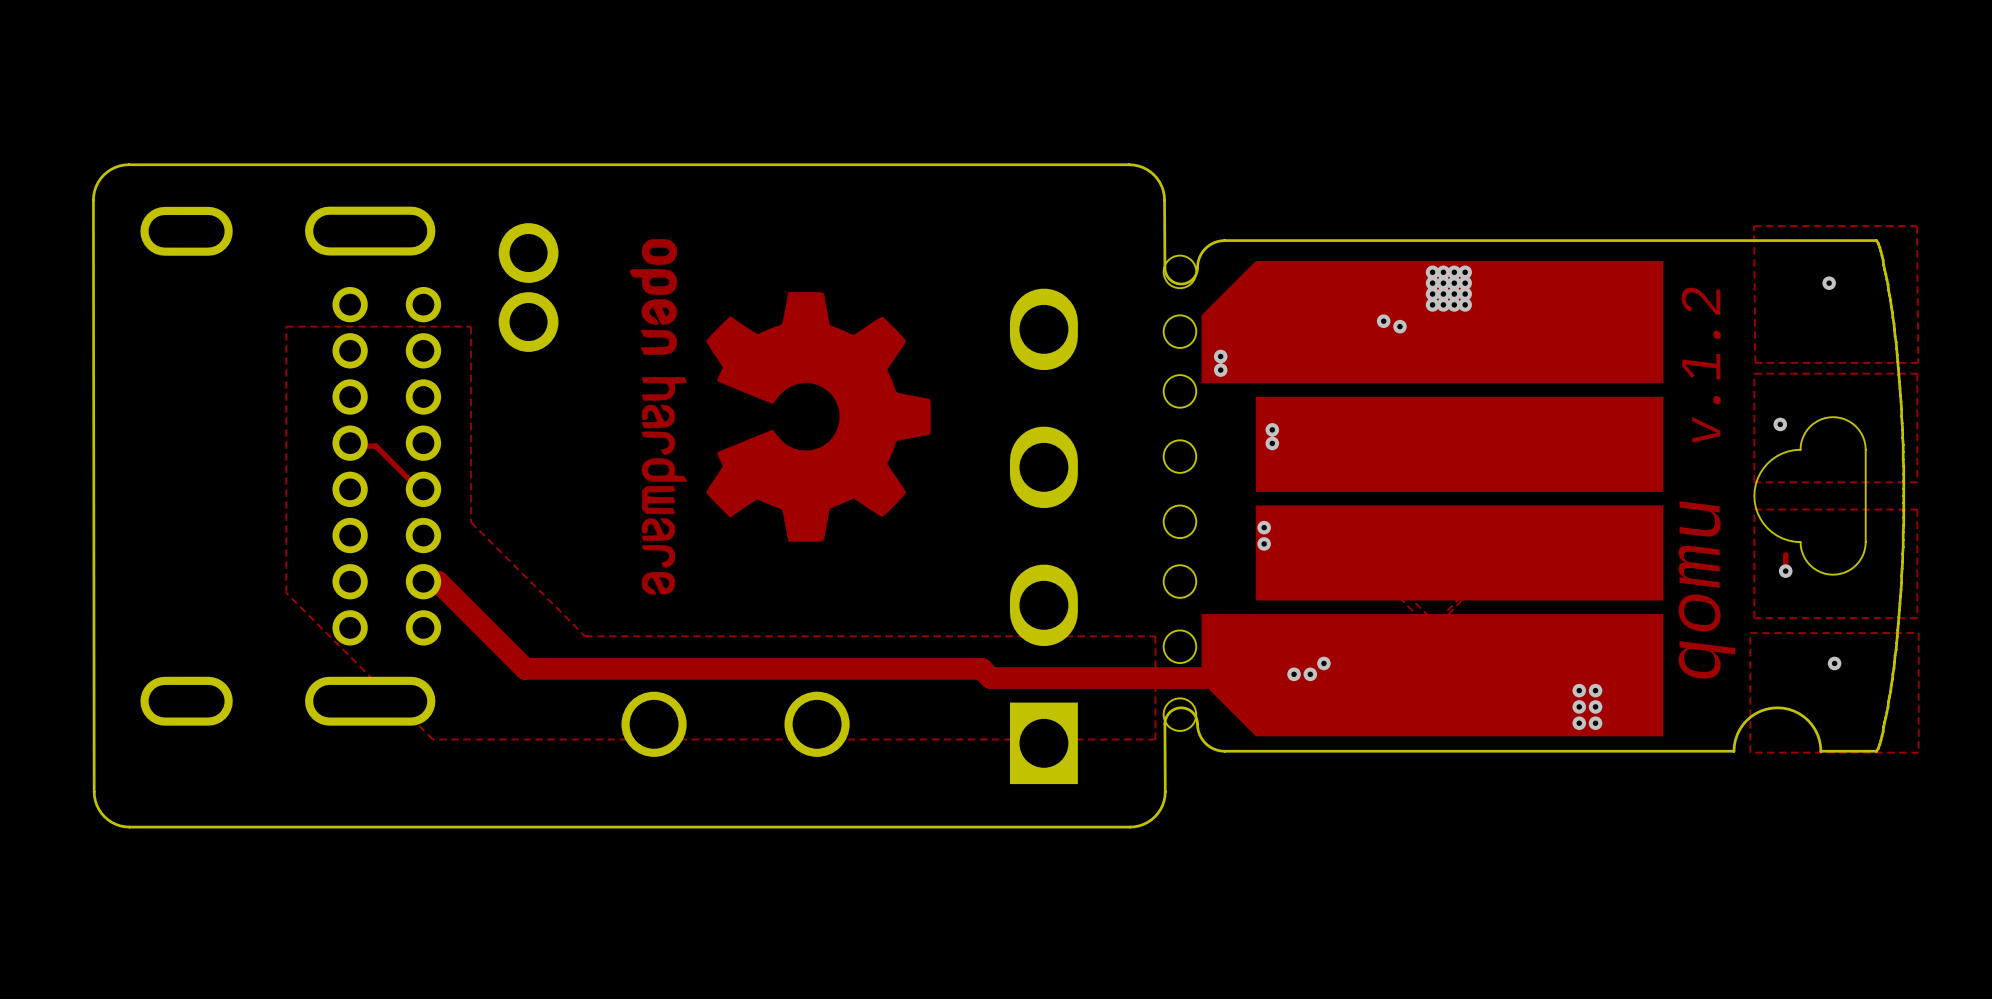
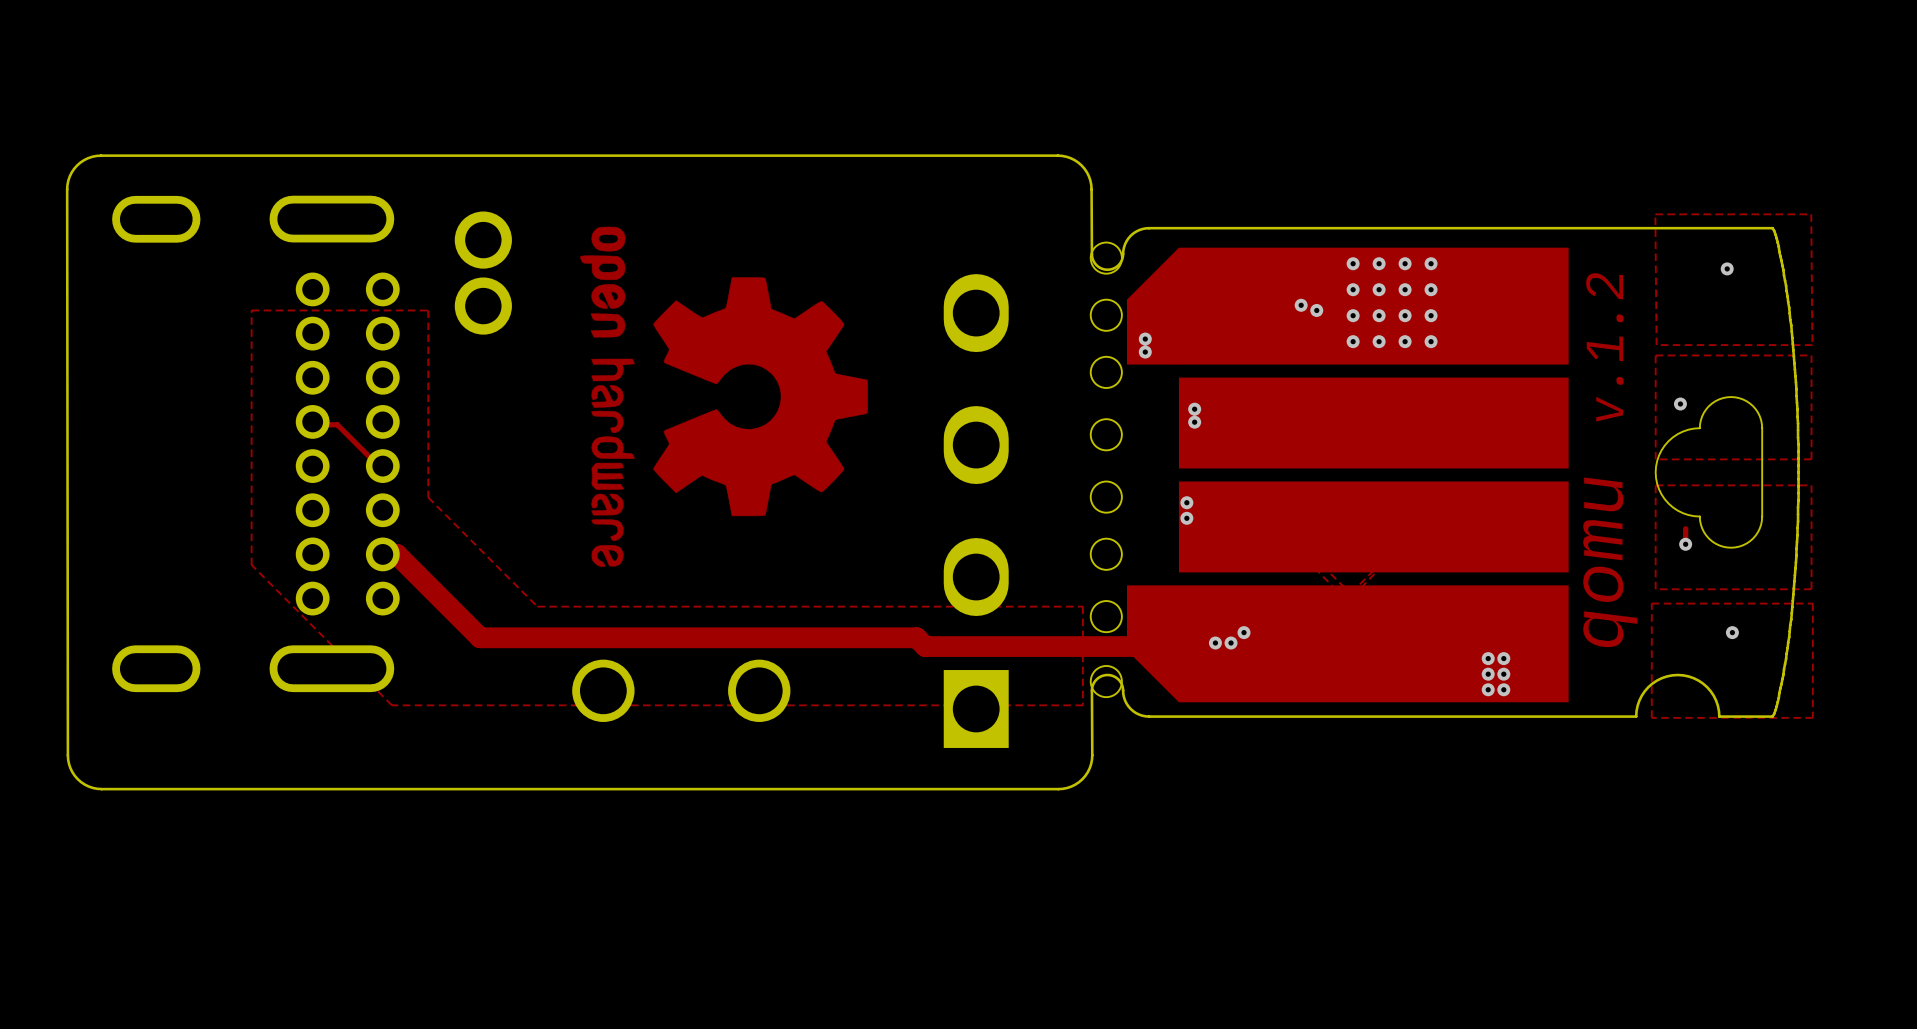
via: (1432, 272) -> none
via: (1443, 272) -> none
via: (1454, 272) -> none
via: (1465, 272) -> none
via: none -> (1353, 263)
via: none -> (1379, 263)
via: none -> (1405, 263)
via: none -> (1431, 263)
via: (1432, 283) -> none
via: (1443, 283) -> none
via: (1454, 283) -> none
via: (1465, 283) -> none
via: (1432, 294) -> none
via: (1443, 294) -> none
via: (1454, 294) -> none
via: (1465, 294) -> none
via: (1432, 304) -> none
via: none -> (1353, 289)
via: (1443, 304) -> none
via: (1454, 304) -> none
via: none -> (1405, 289)
via: none -> (1431, 289)
via: none -> (1353, 315)
via: none -> (1379, 315)
via: none -> (1405, 315)
via: none -> (1431, 315)
via: none -> (1353, 341)
via: none -> (1379, 341)
via: none -> (1405, 341)
via: none -> (1431, 341)

